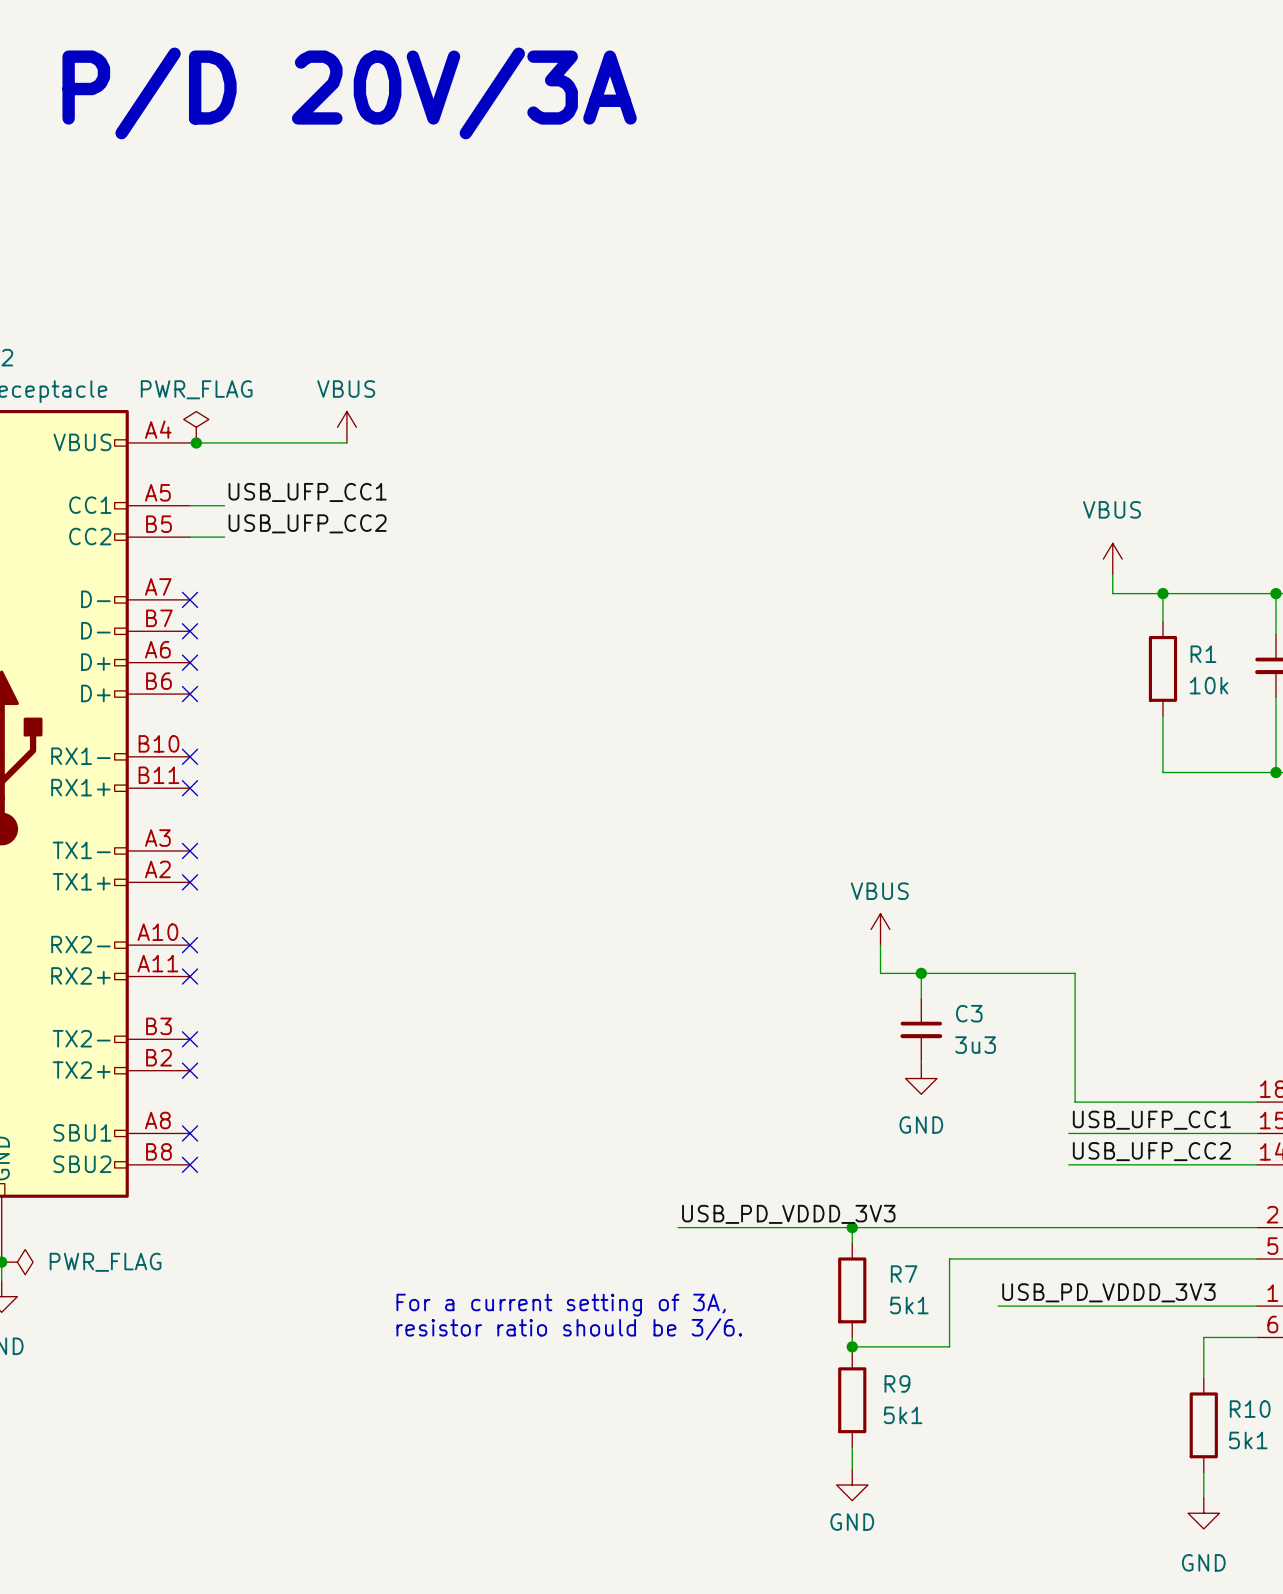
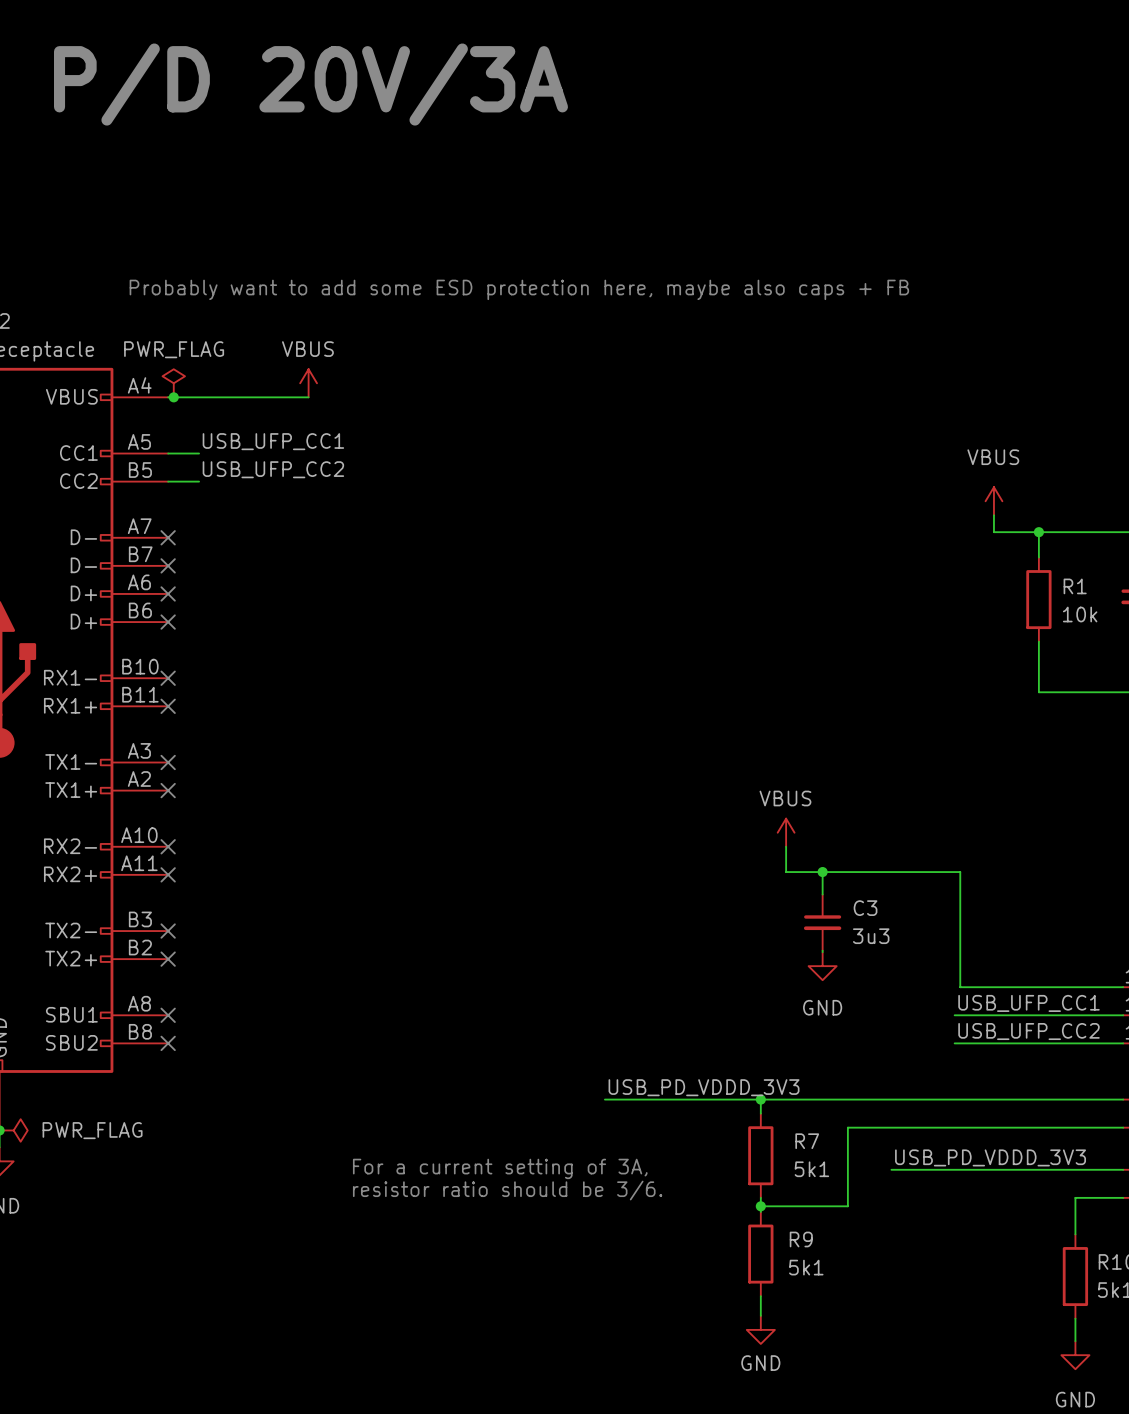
text: none -> Probably want to add some ESD protection here, maybe also caps + FB (519, 289)

